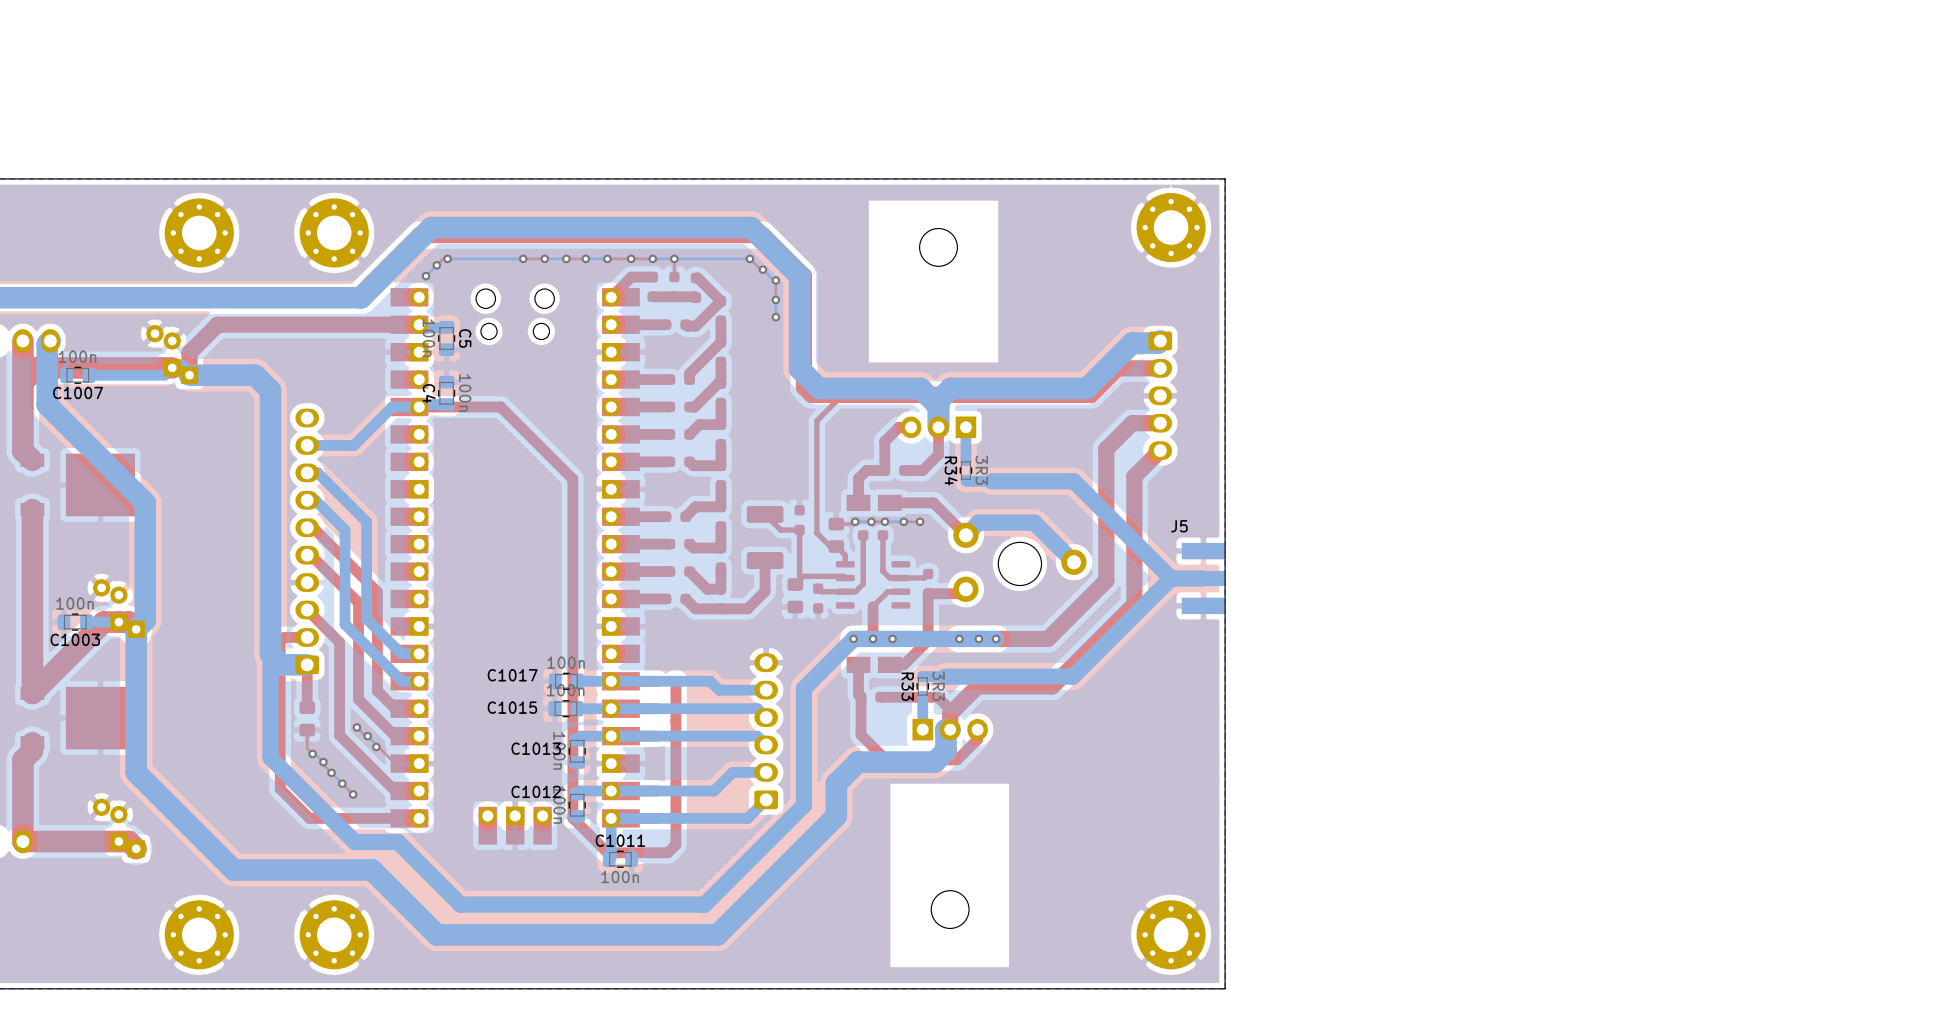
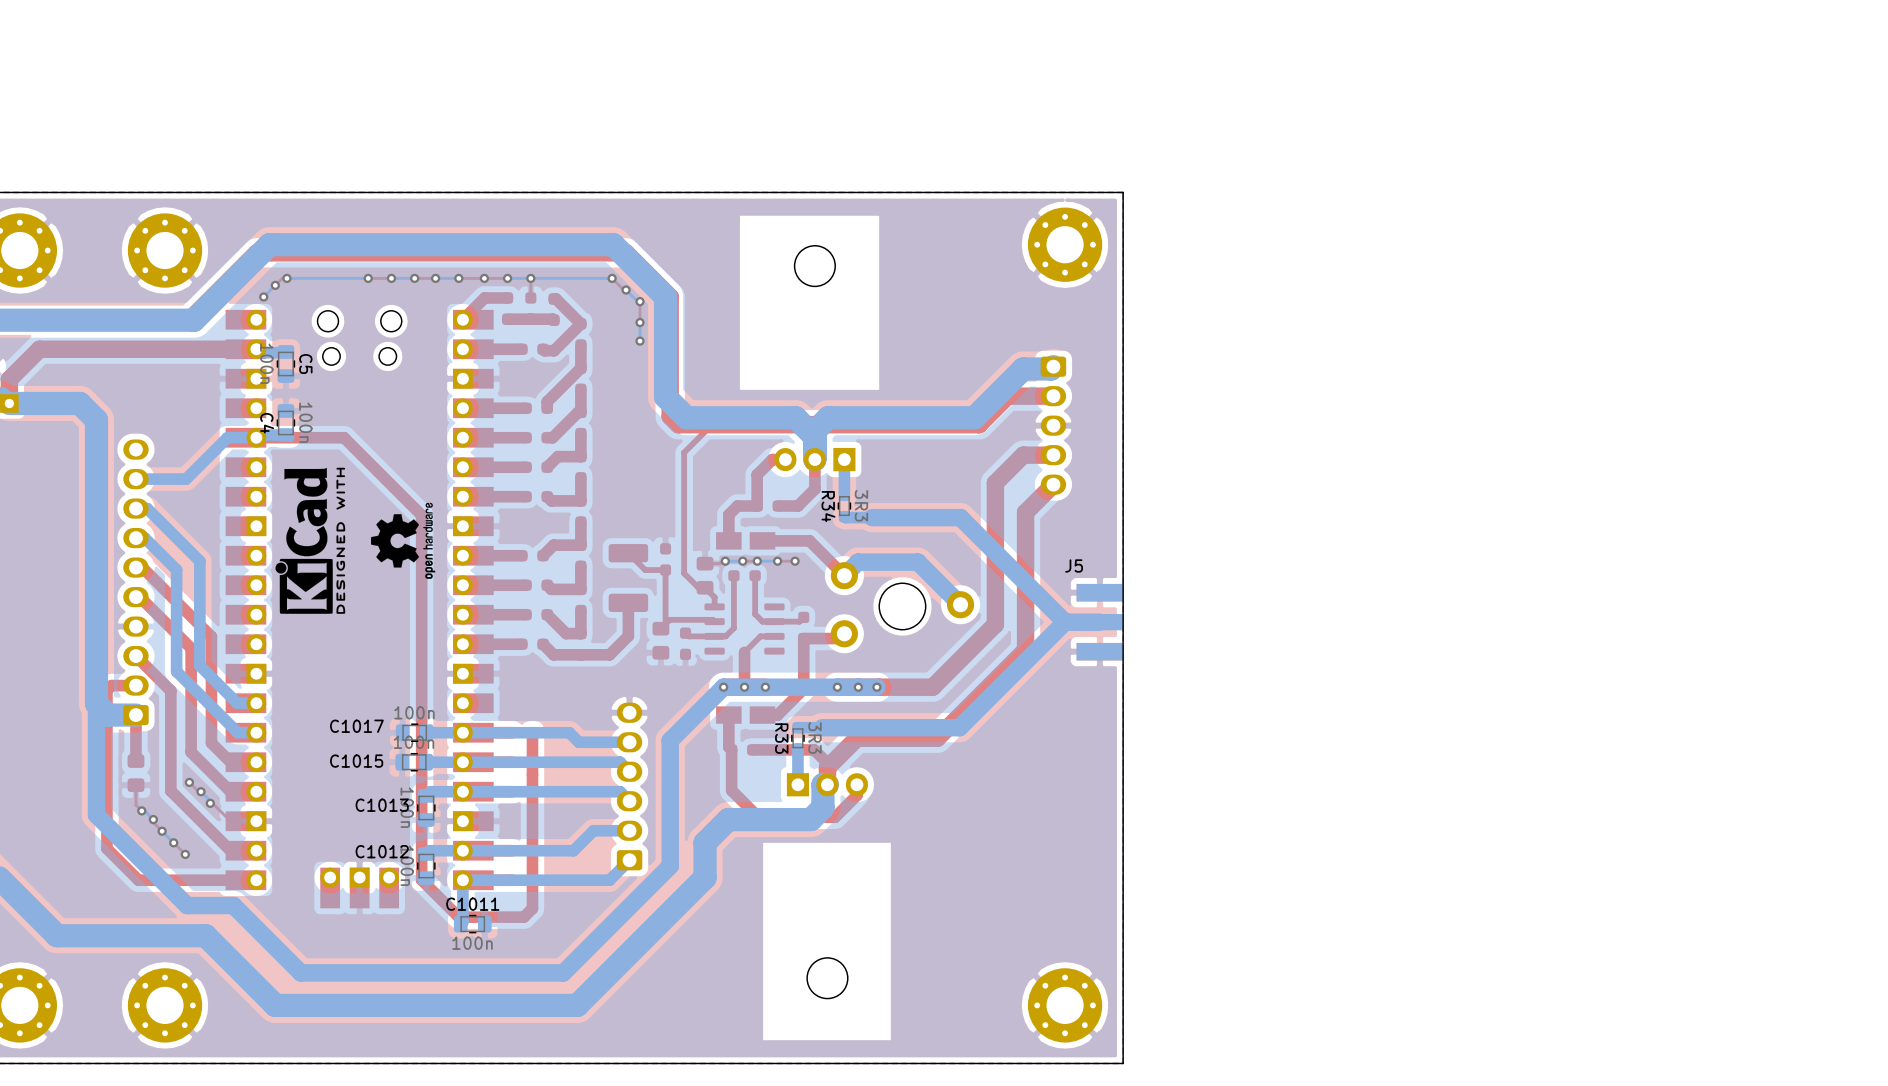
drawing: none -> [275, 467, 346, 614]
drawing: none -> [371, 502, 436, 579]

